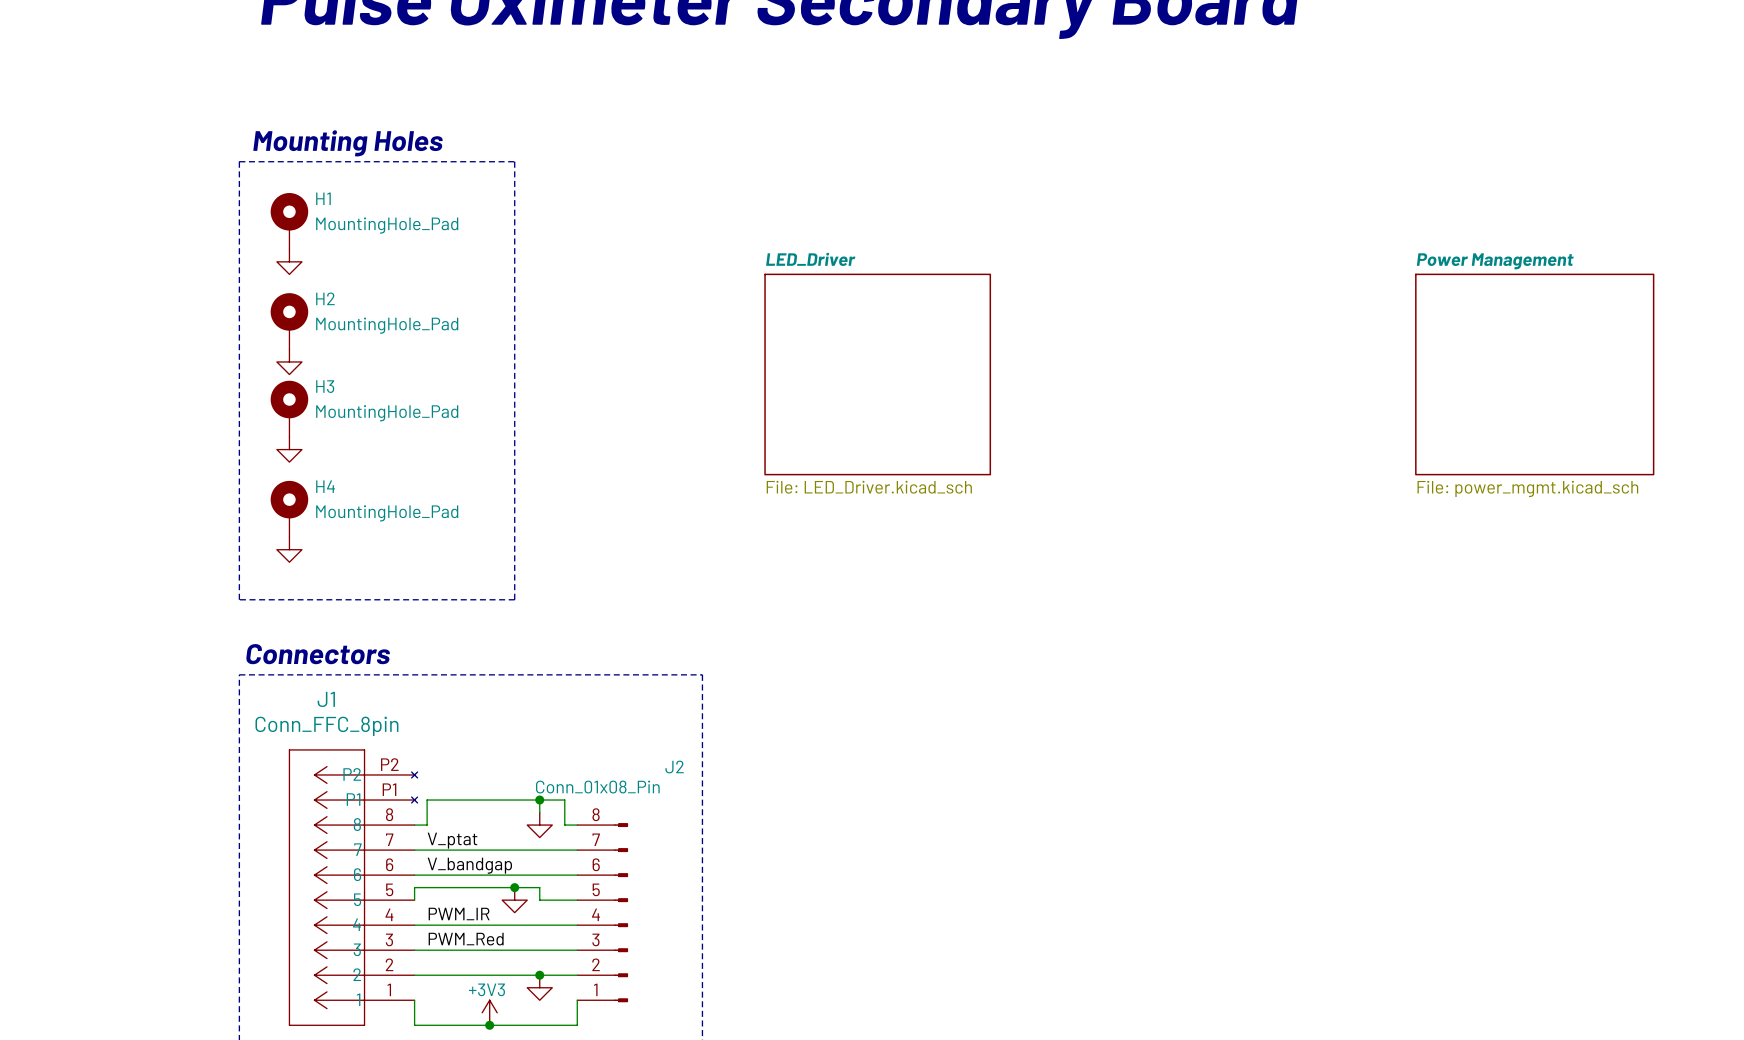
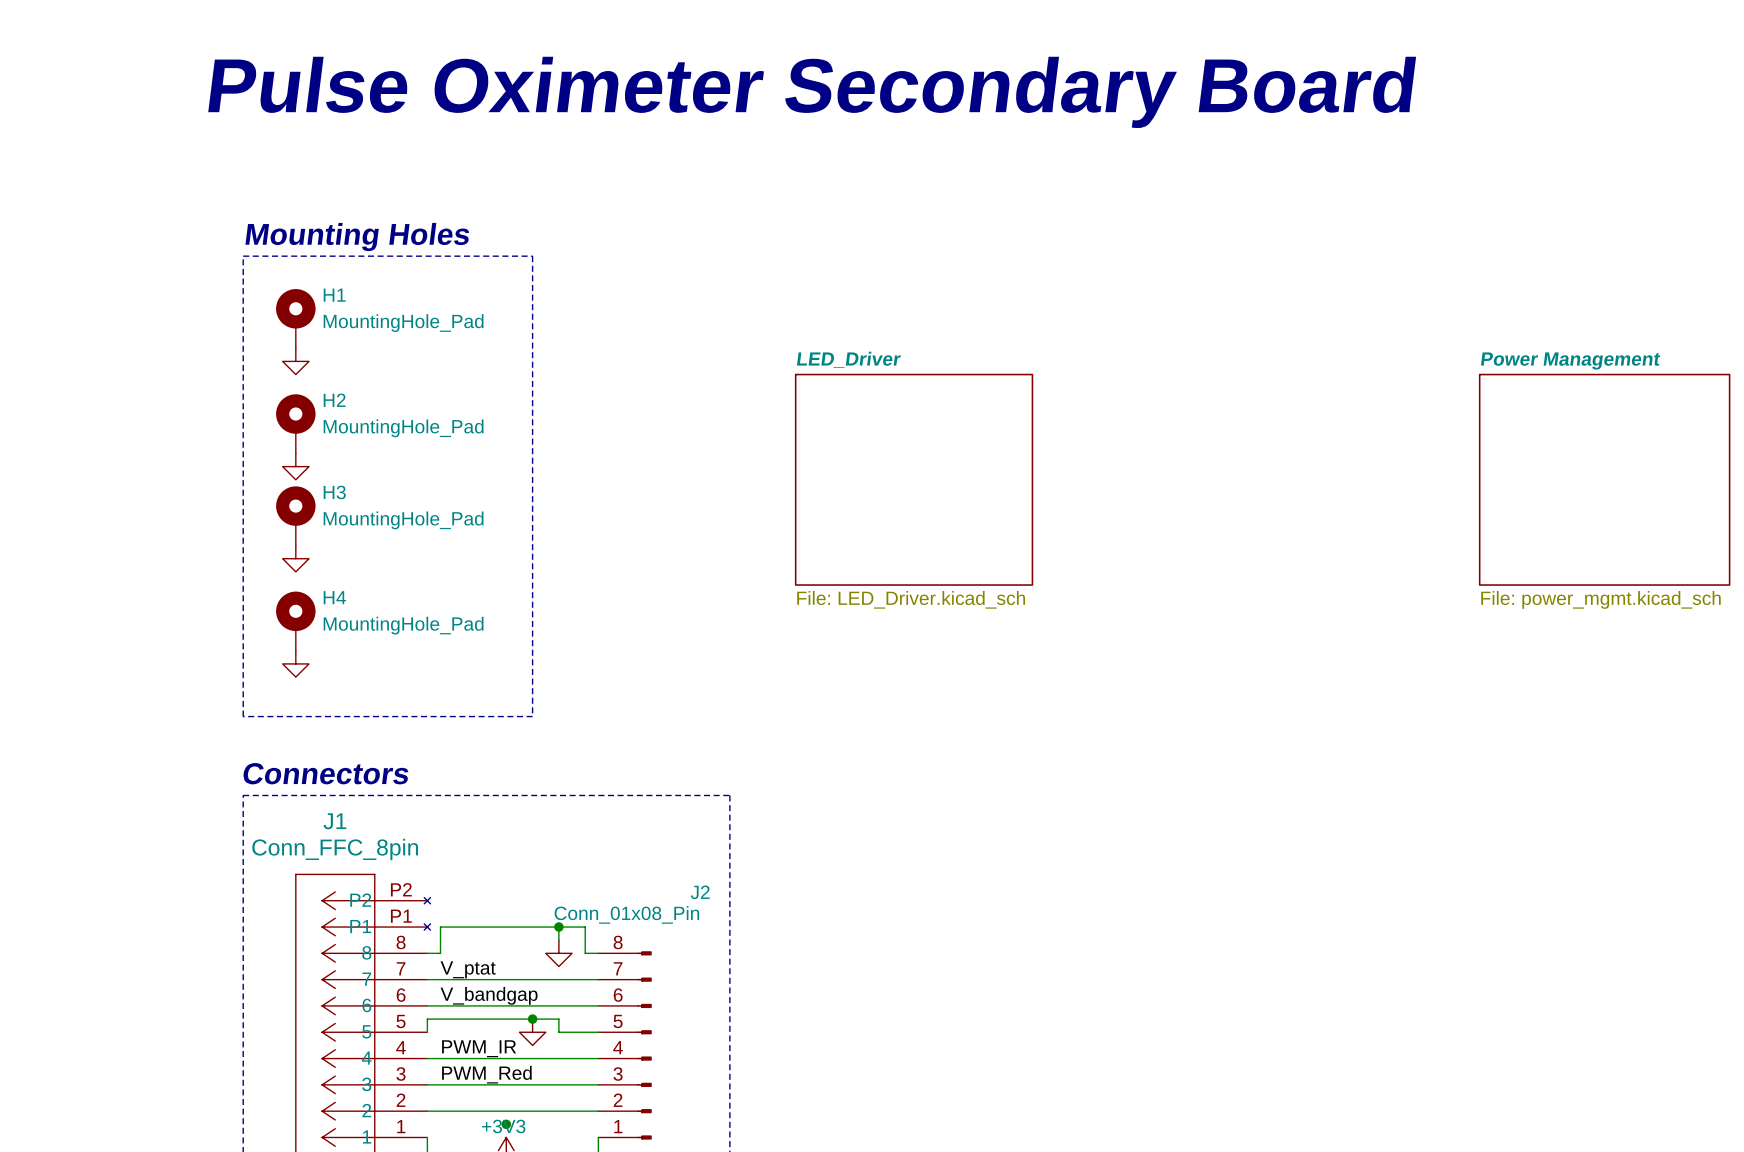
junction: (539, 975) -> none
junction: none -> (506, 1124)
power symbol: (539, 987) -> none

